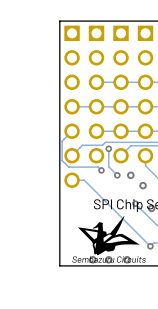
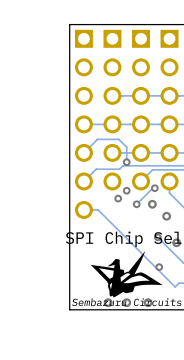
track: (72, 131) (62, 141) (62, 160) (68, 167) (98, 167) (101, 170) -> (83, 152) (97, 139) (118, 139) (126, 147) (126, 162)
via: none -> (126, 162)
track: (108, 148) (108, 166) (117, 175) -> (154, 188) (136, 204)
via: (108, 148) -> none
via: none -> (154, 188)
via: none -> (126, 190)
via position: (150, 246) -> (159, 267)

